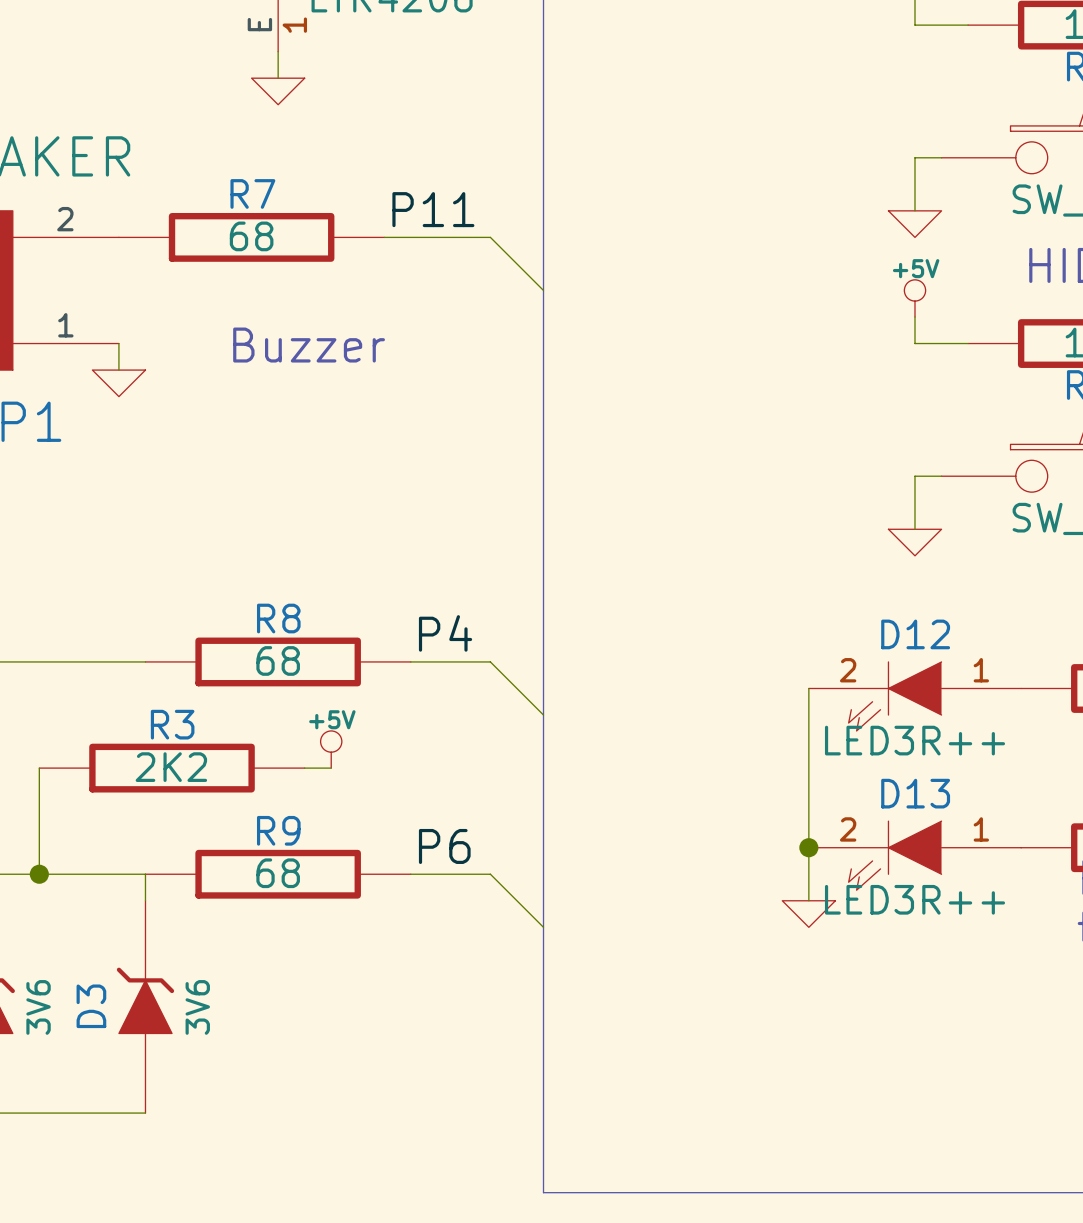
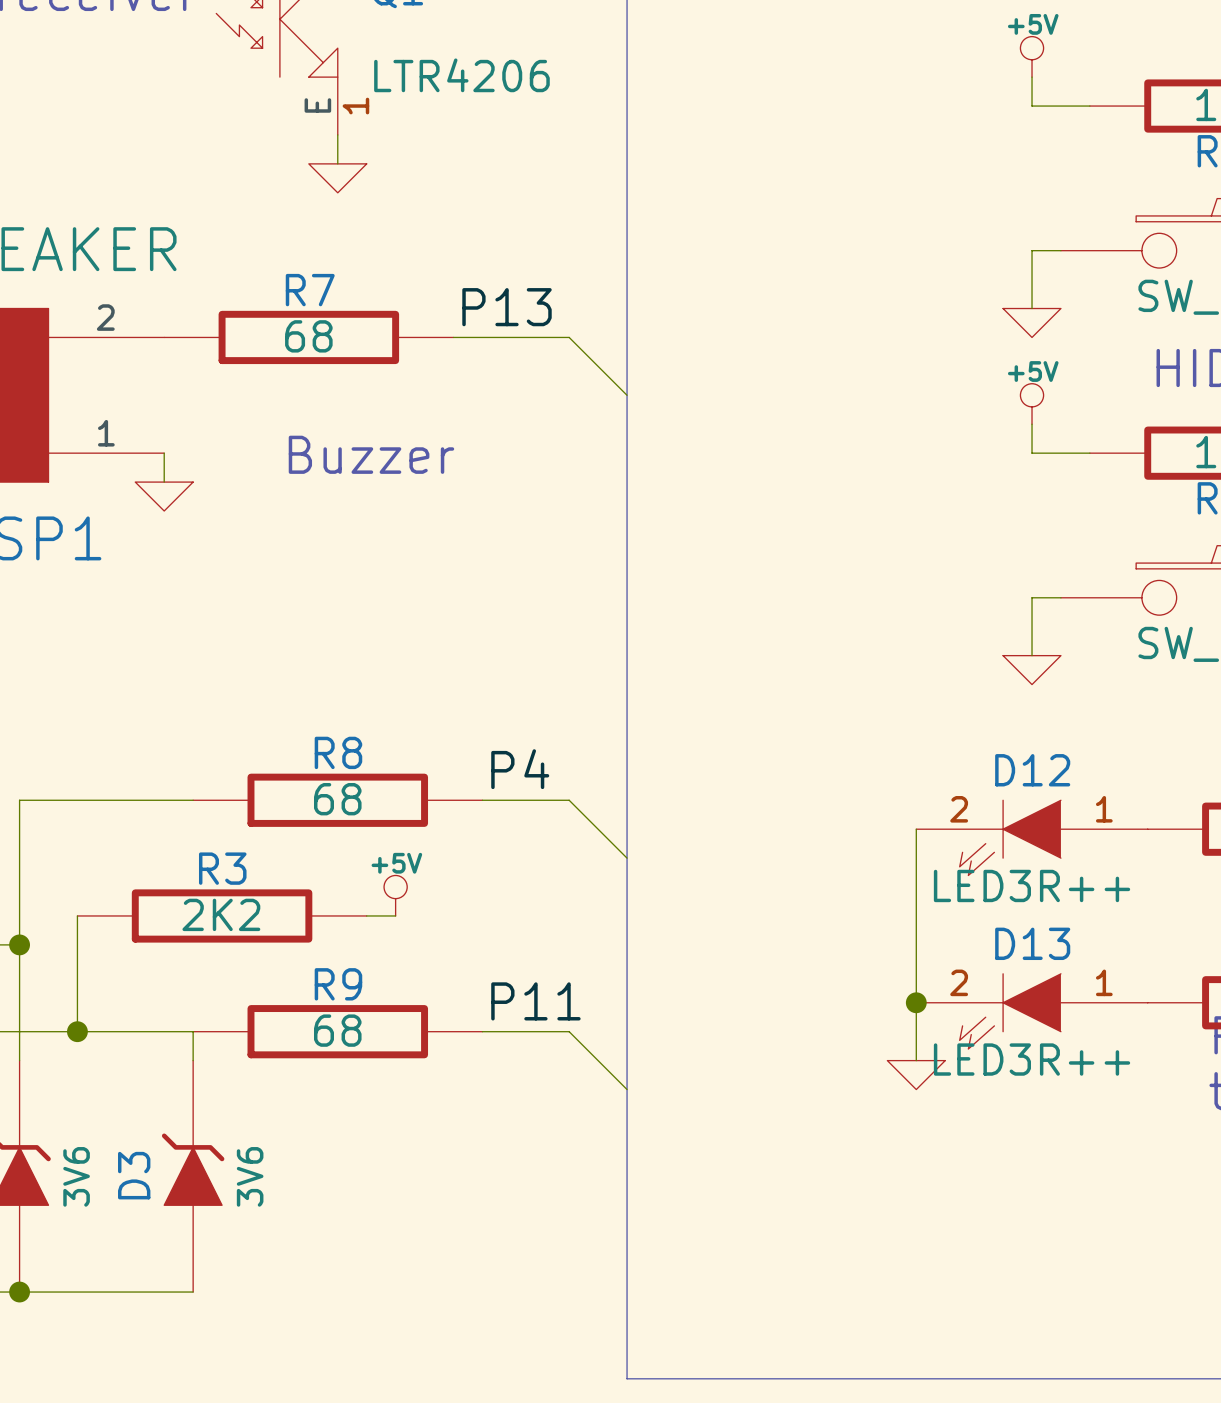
label: P11 (433, 209) -> P13 (507, 307)
label: P6 (444, 846) -> P11 (535, 1001)

